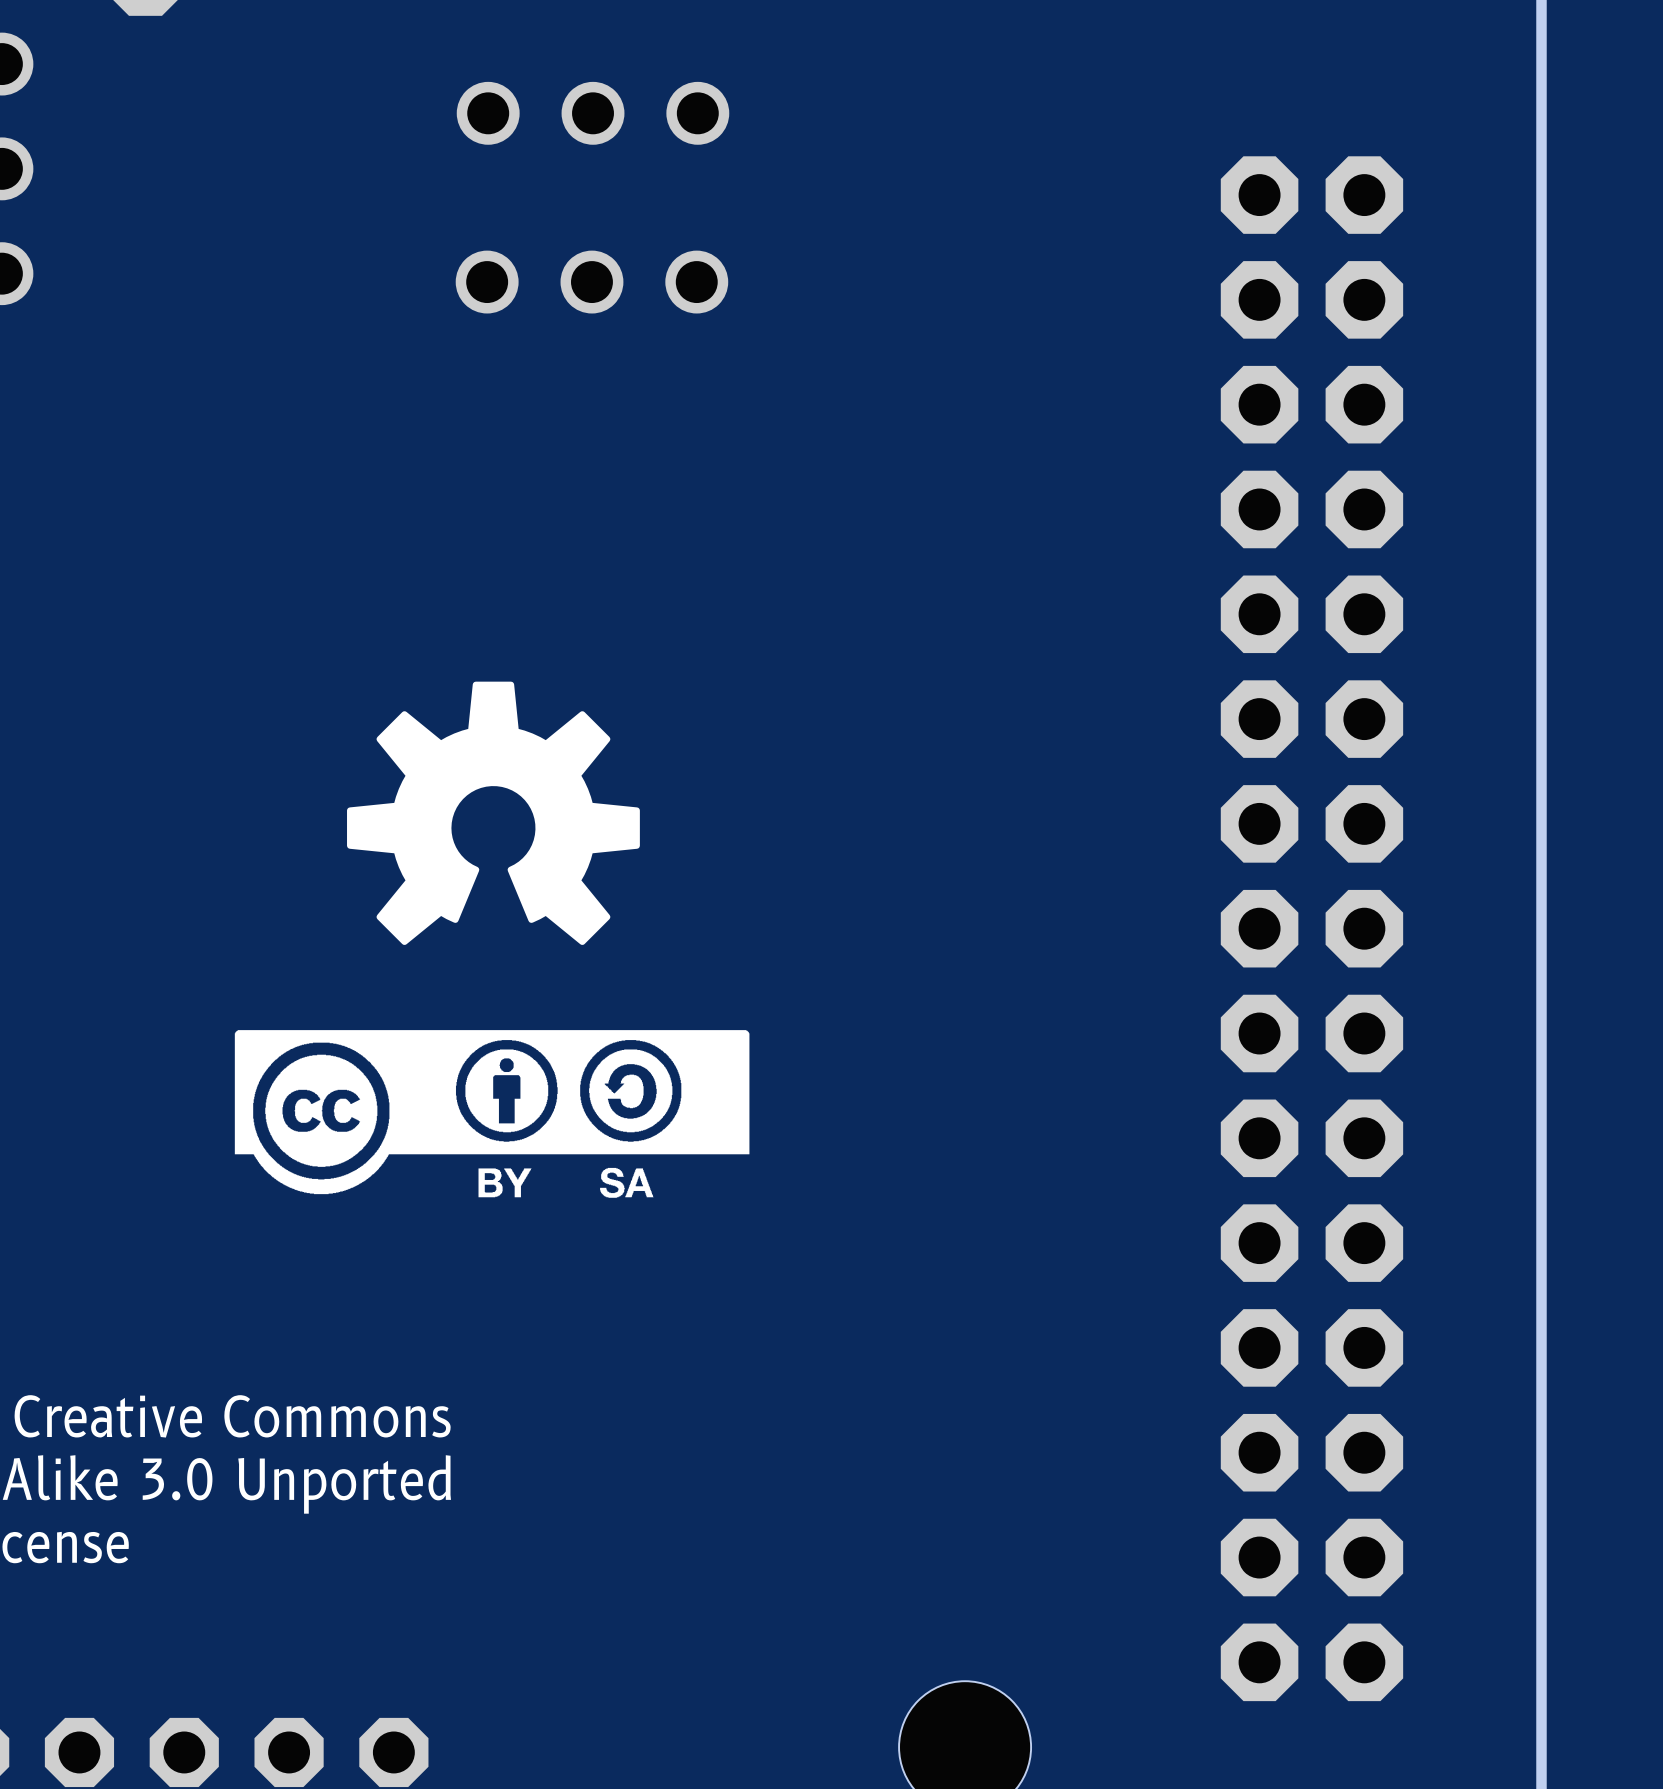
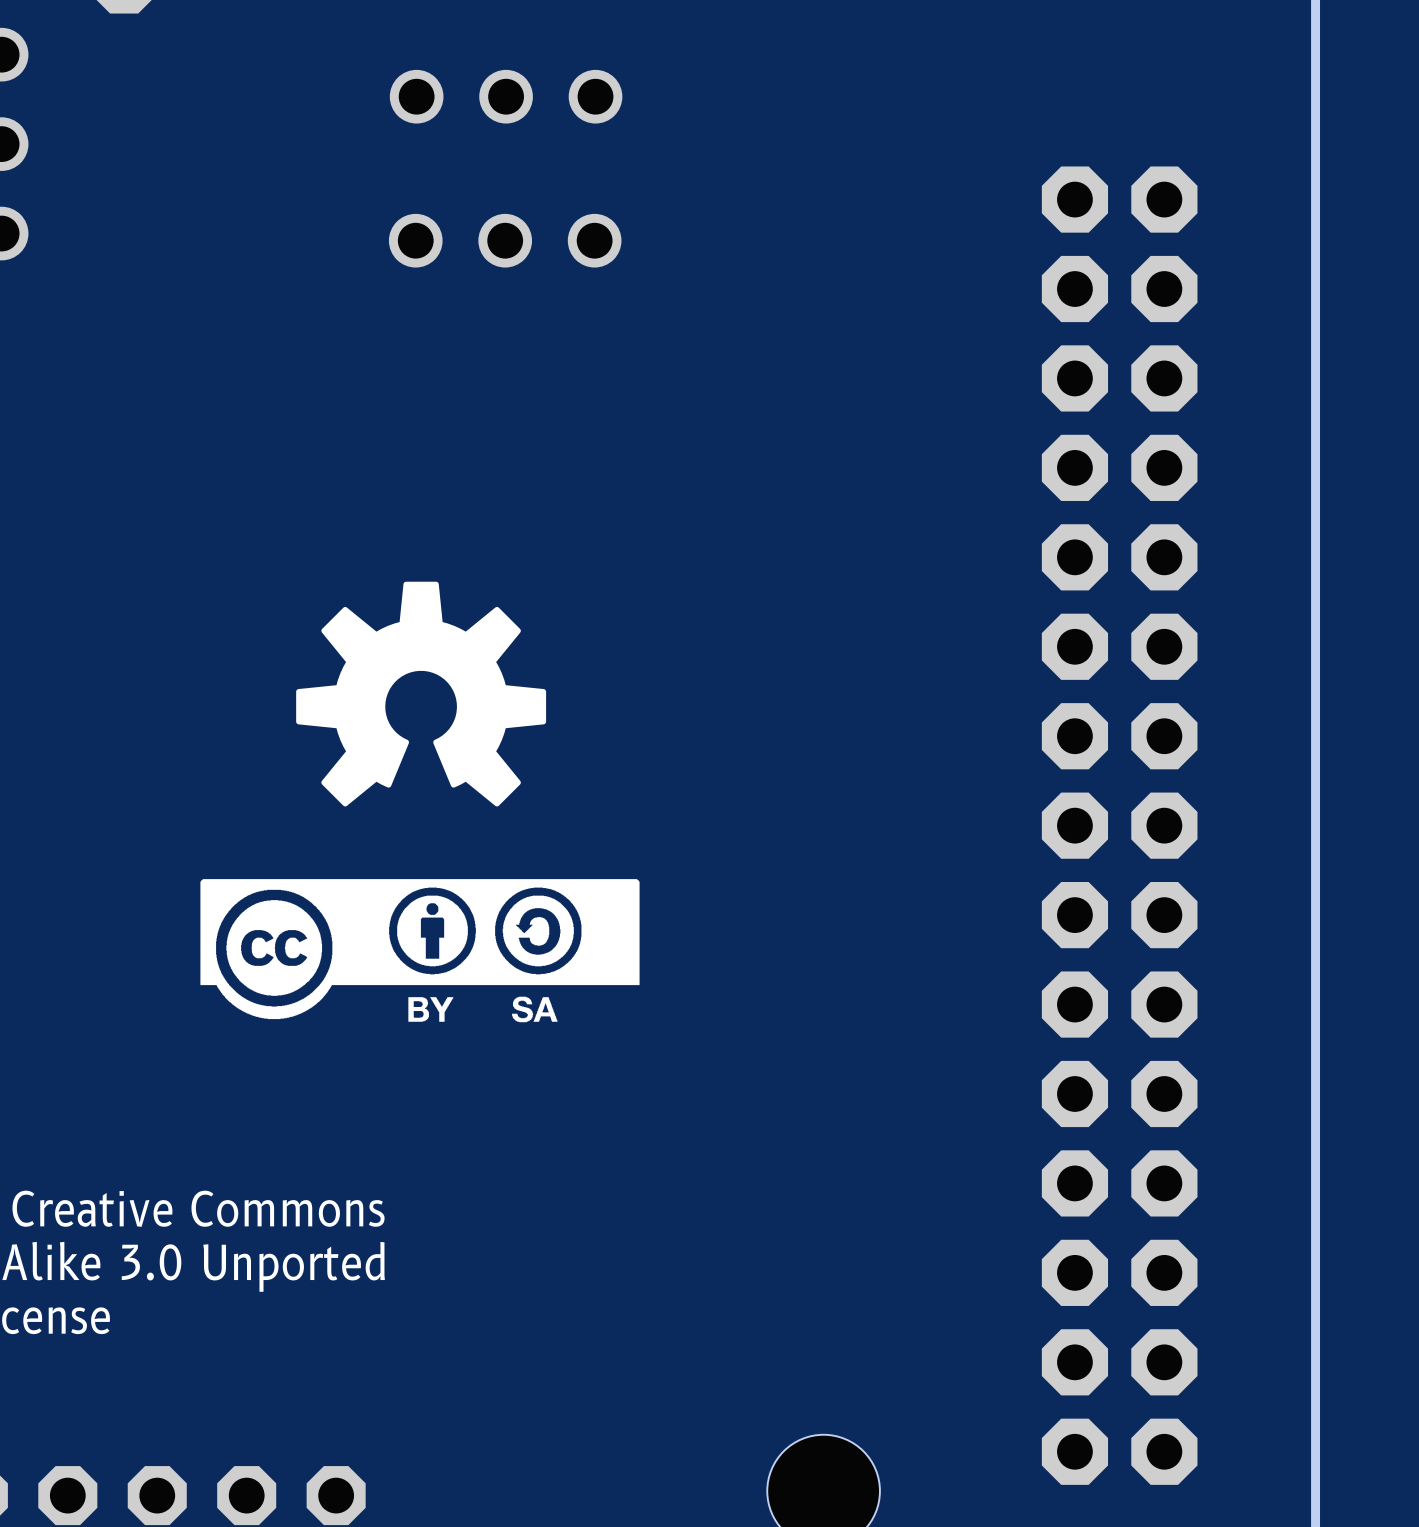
part position: (1311, 928) -> (1119, 825)

